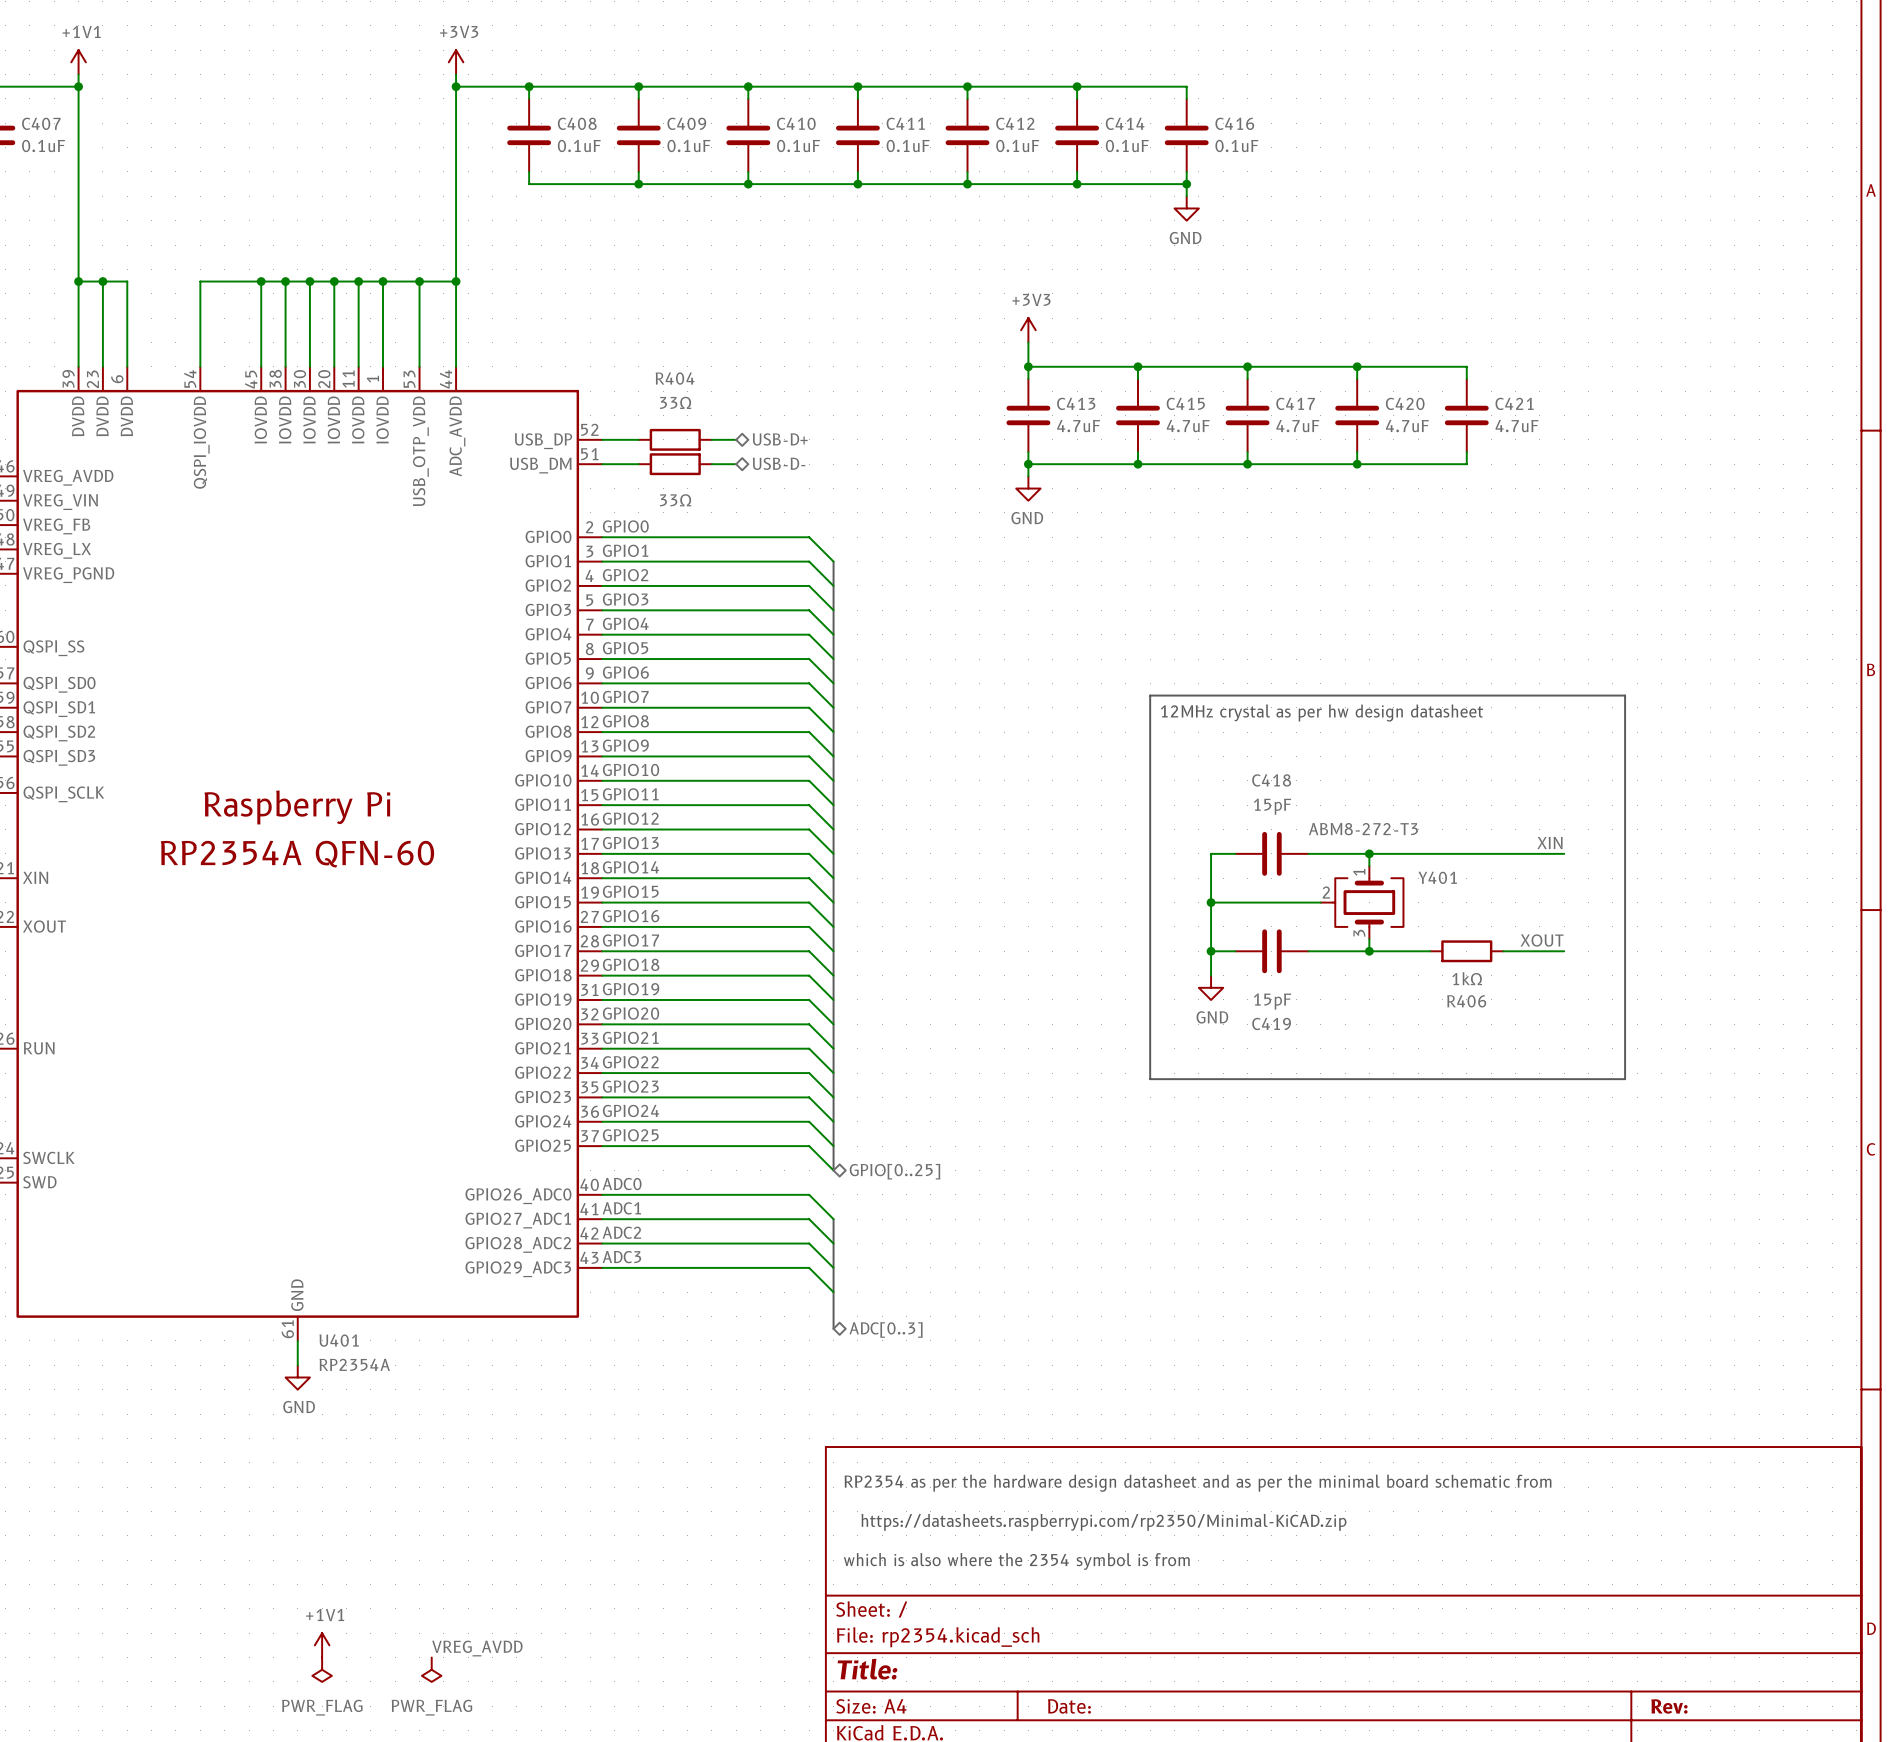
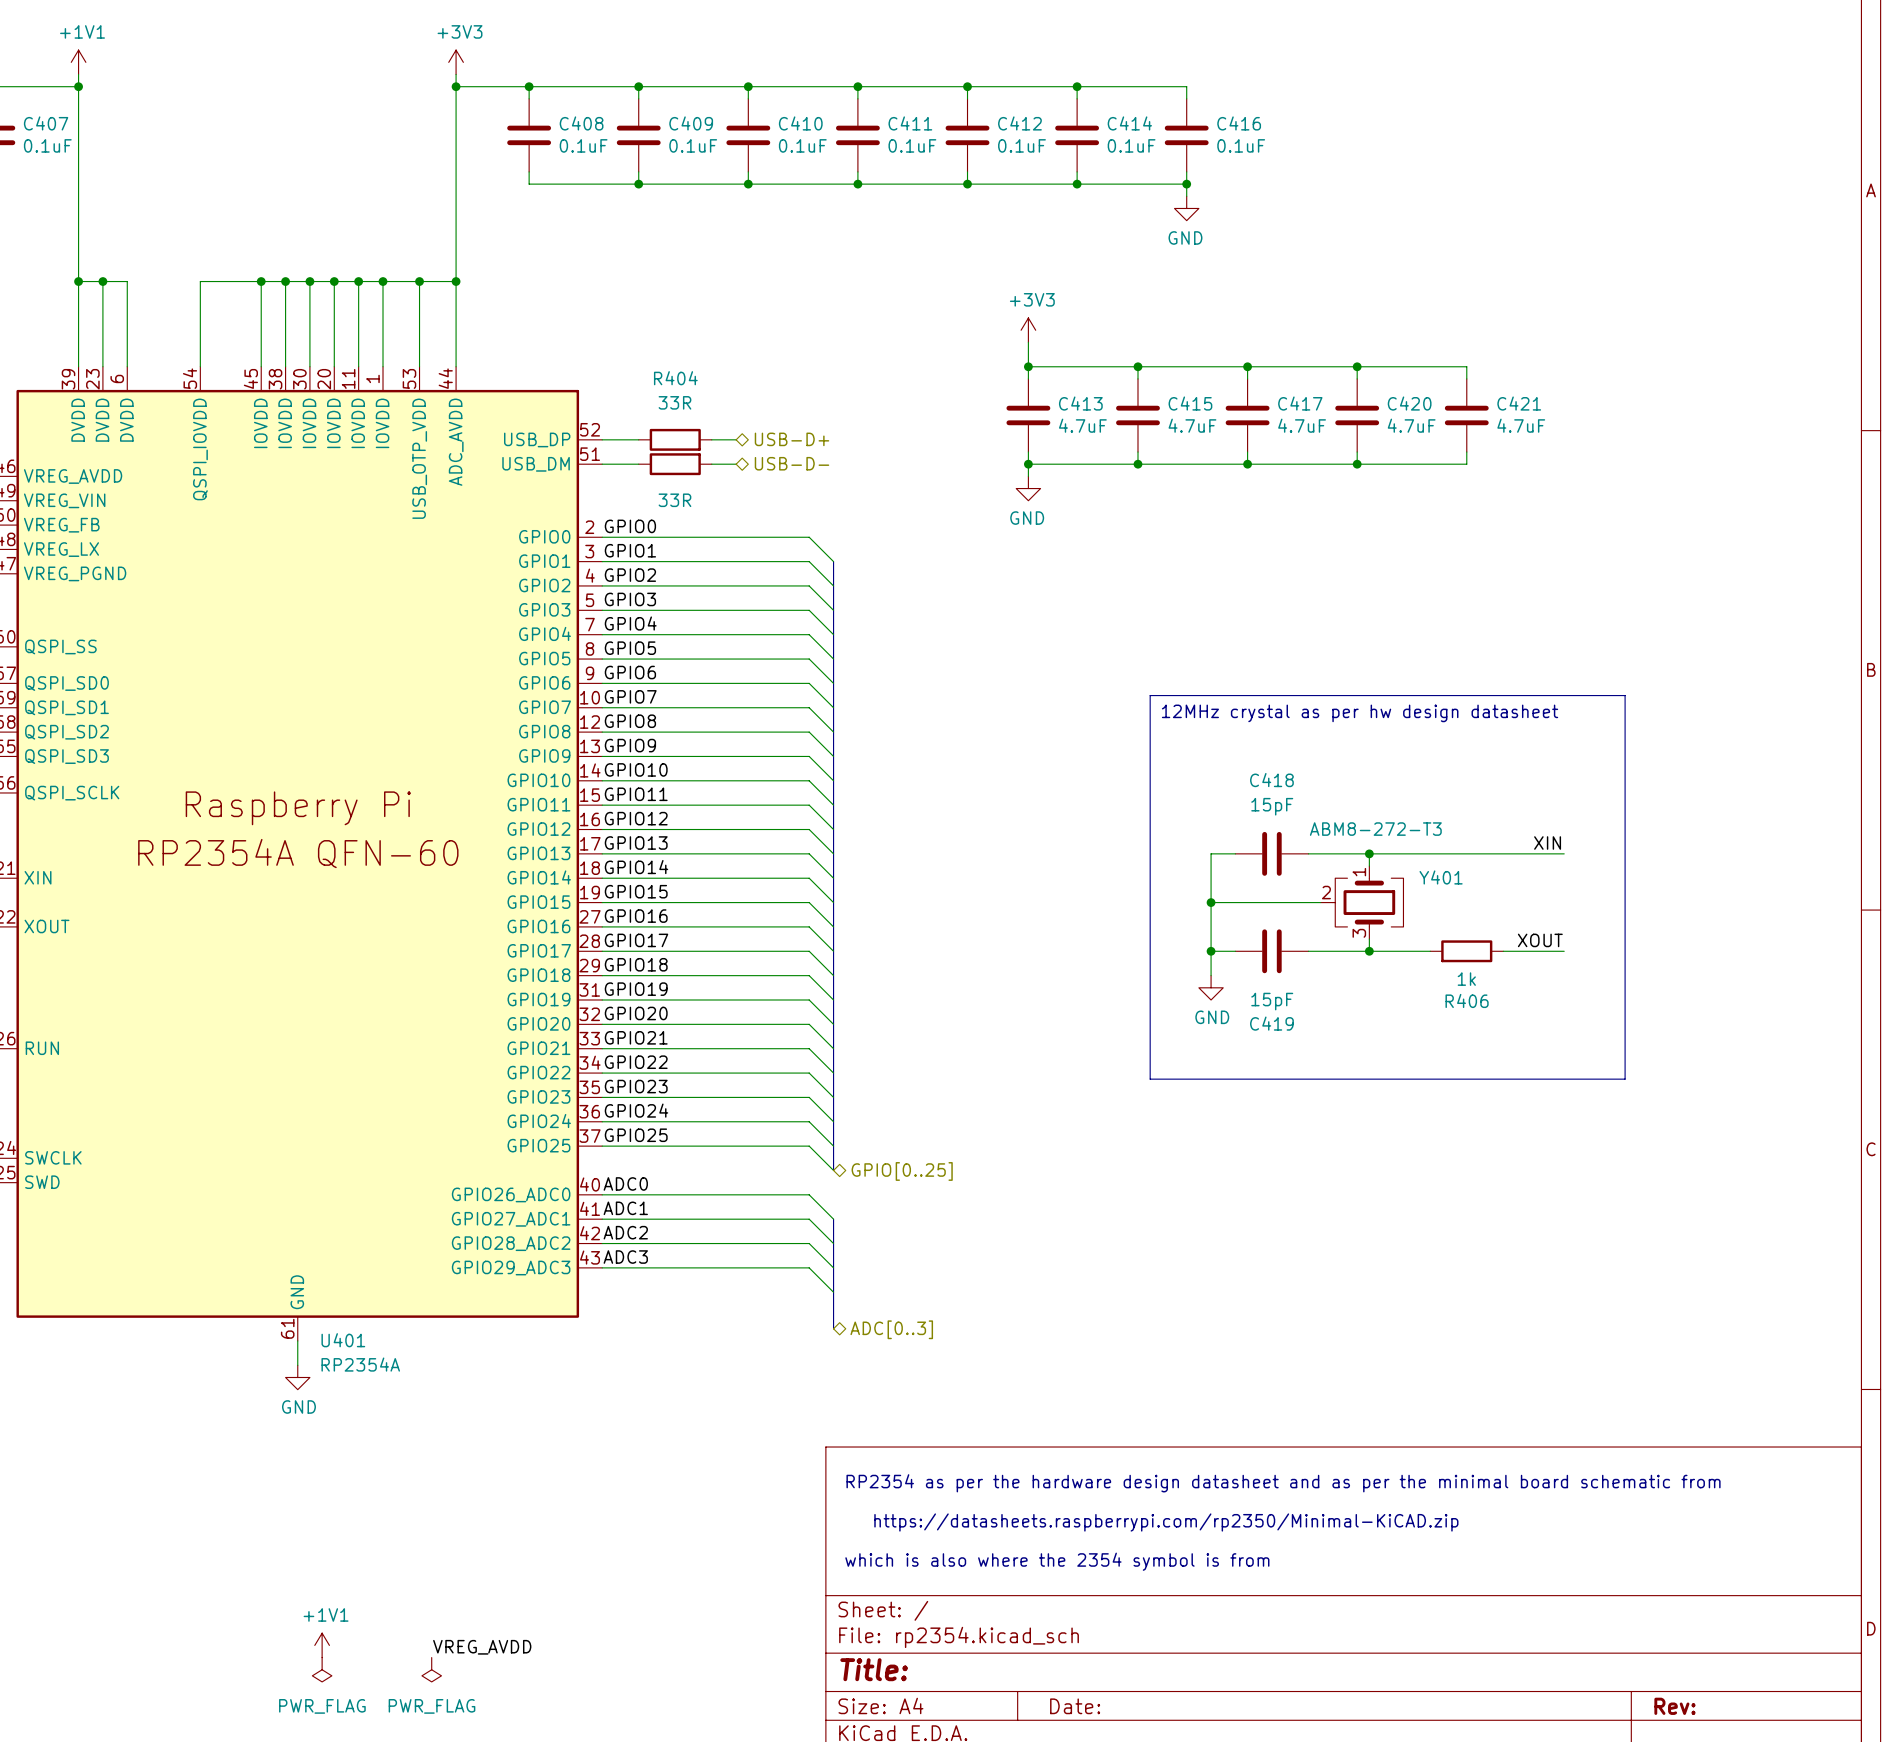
R404 value: 33Ω (675, 402) -> 33R (674, 402)
part value: 33Ω (675, 500) -> 33R (674, 500)
R406 value: 1kΩ (1467, 978) -> 1k (1466, 979)

